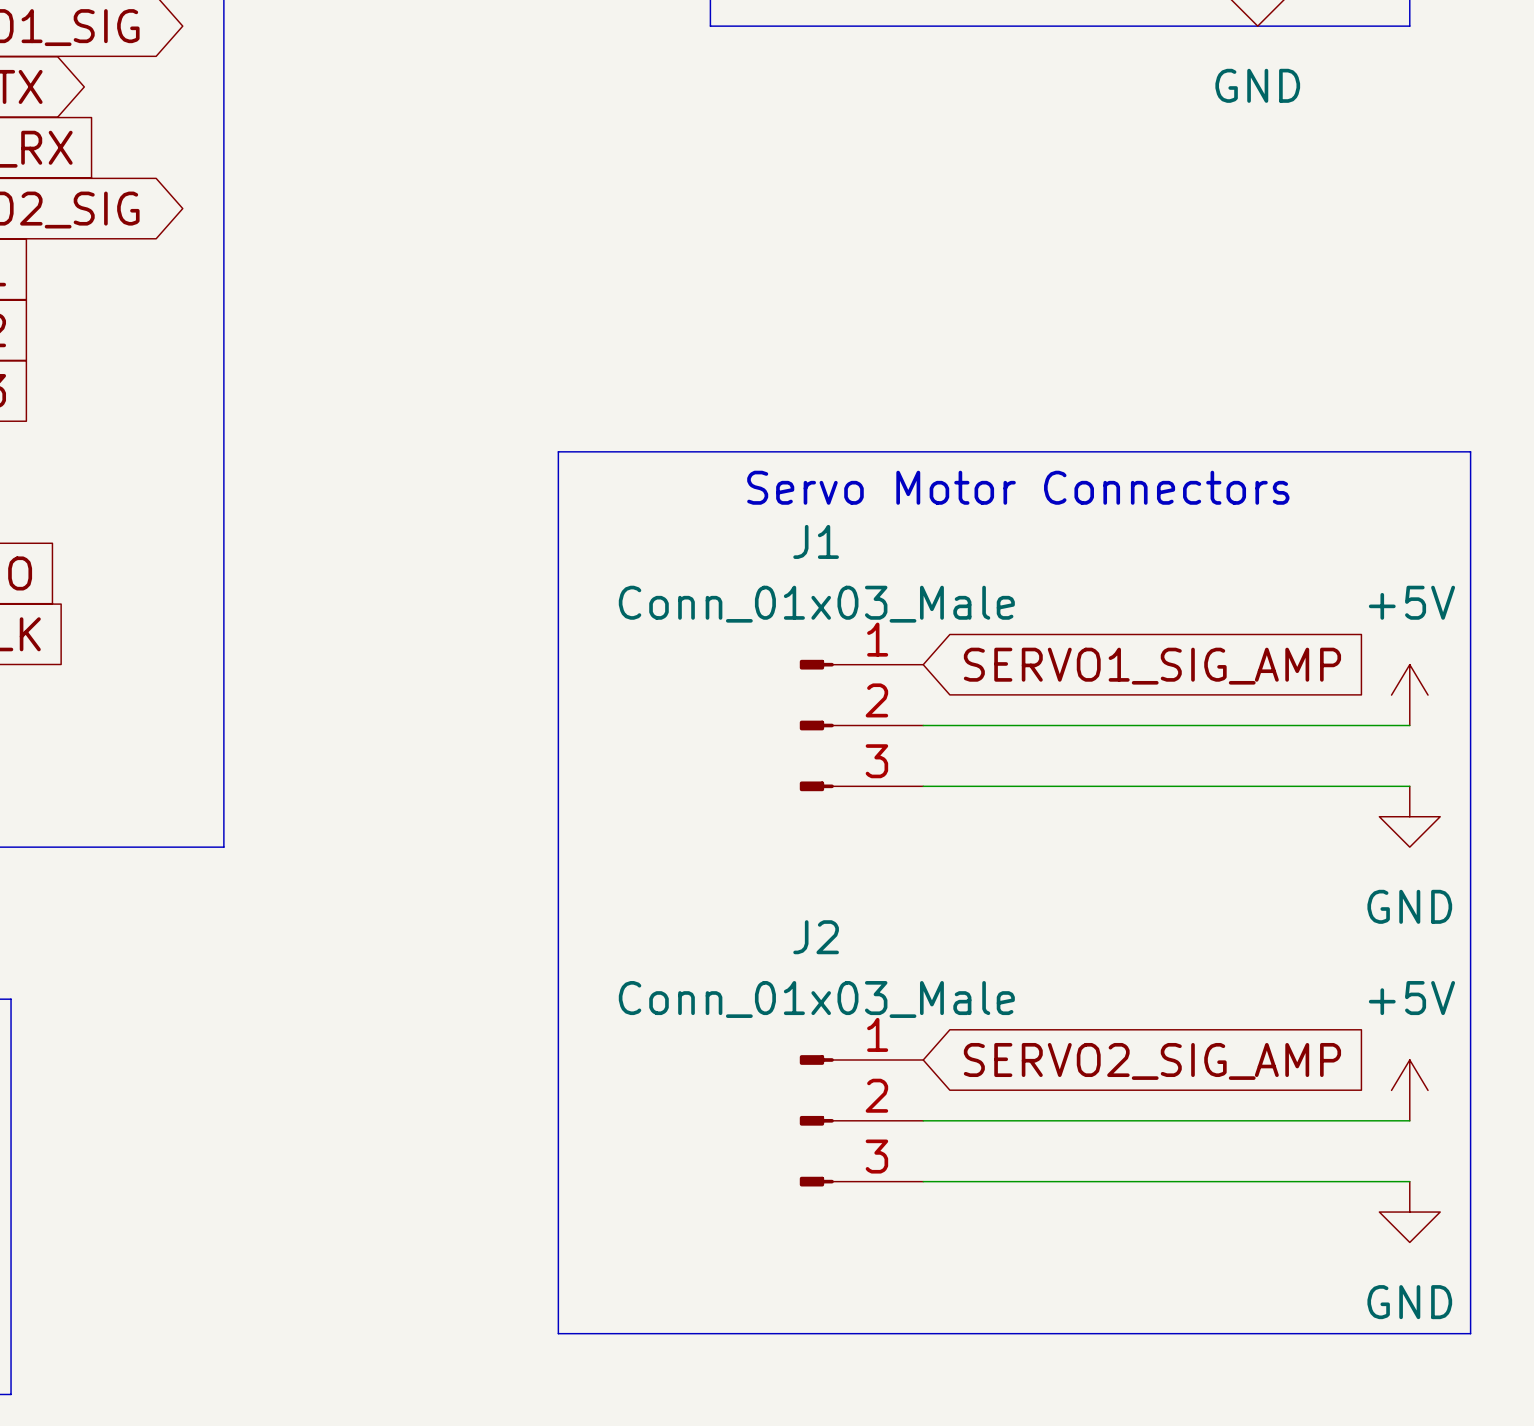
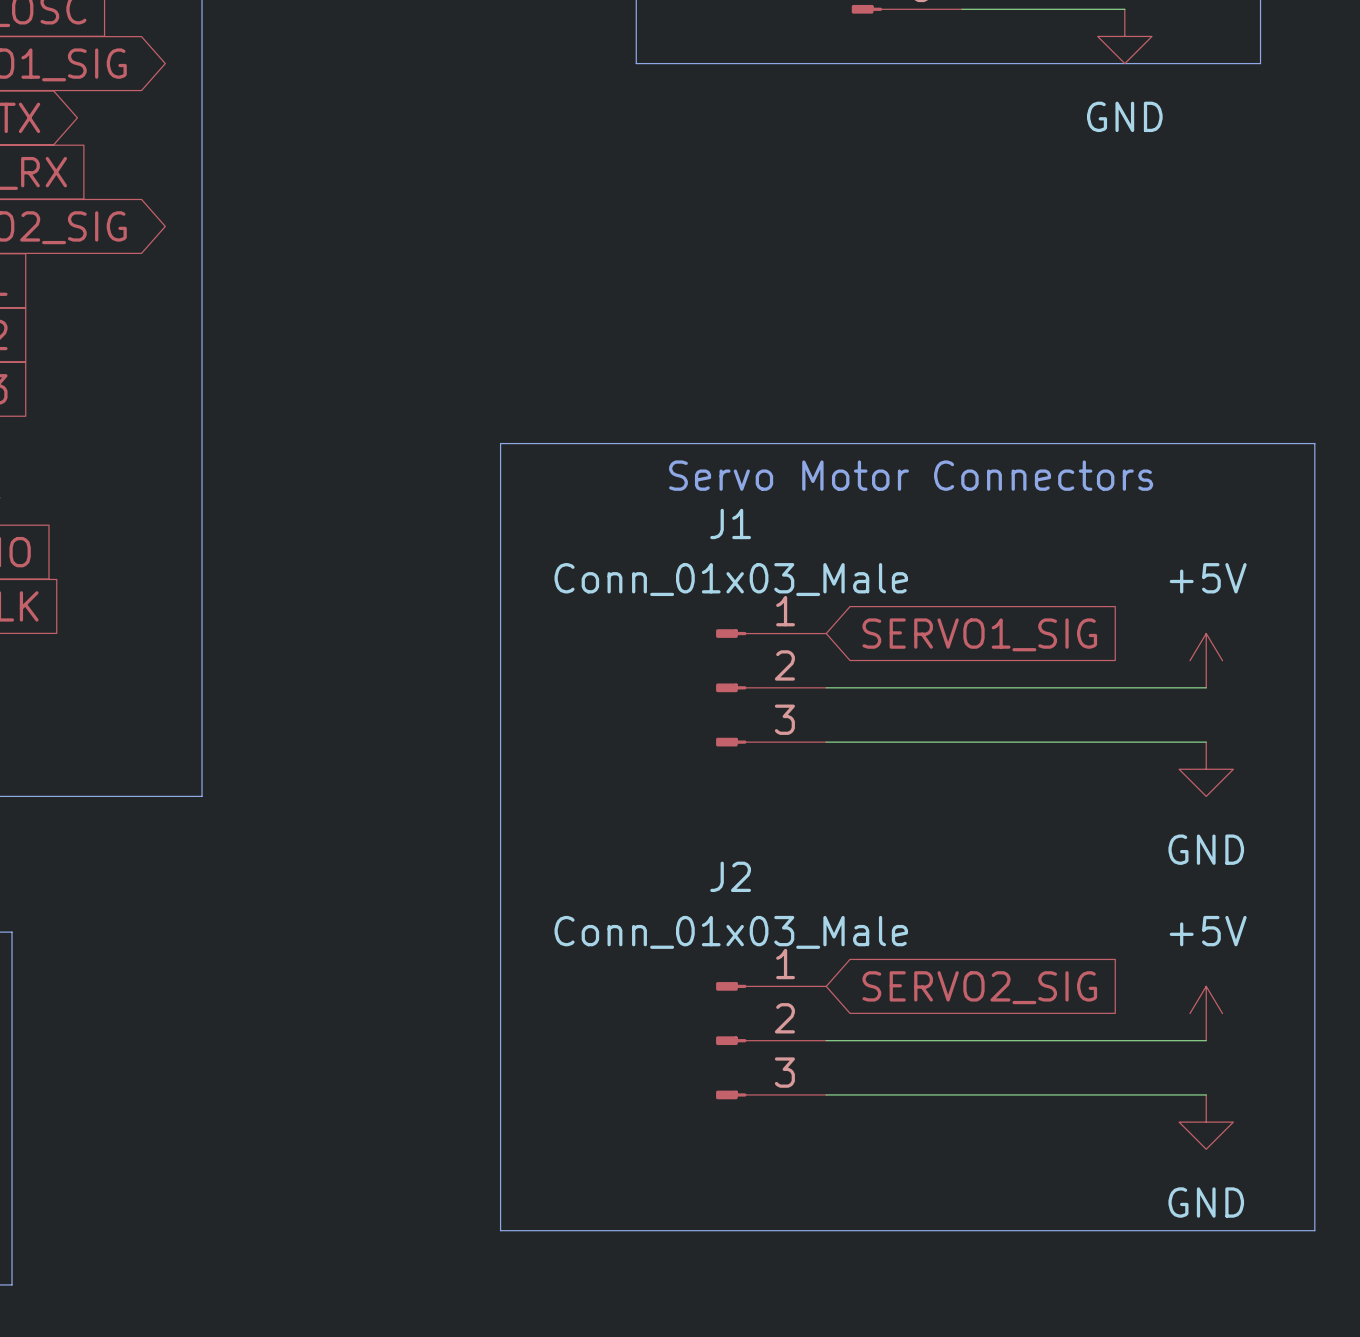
global label: SERVO1_SIG_AMP (1152, 666) -> SERVO1_SIG (979, 634)
power symbol position: +5V (1409, 695) -> +5V (1206, 660)
wire: (1348, 725) (1409, 725) -> none
wire: (1348, 786) (1409, 786) -> none
power symbol position: GND (1409, 816) -> GND (1206, 769)
global label: SERVO2_SIG_AMP (1152, 1061) -> SERVO2_SIG (979, 987)
power symbol position: +5V (1409, 1090) -> +5V (1206, 1013)
wire: (1348, 1120) (1409, 1120) -> none
wire: (1348, 1181) (1409, 1181) -> none
power symbol position: GND (1409, 1212) -> GND (1206, 1122)

